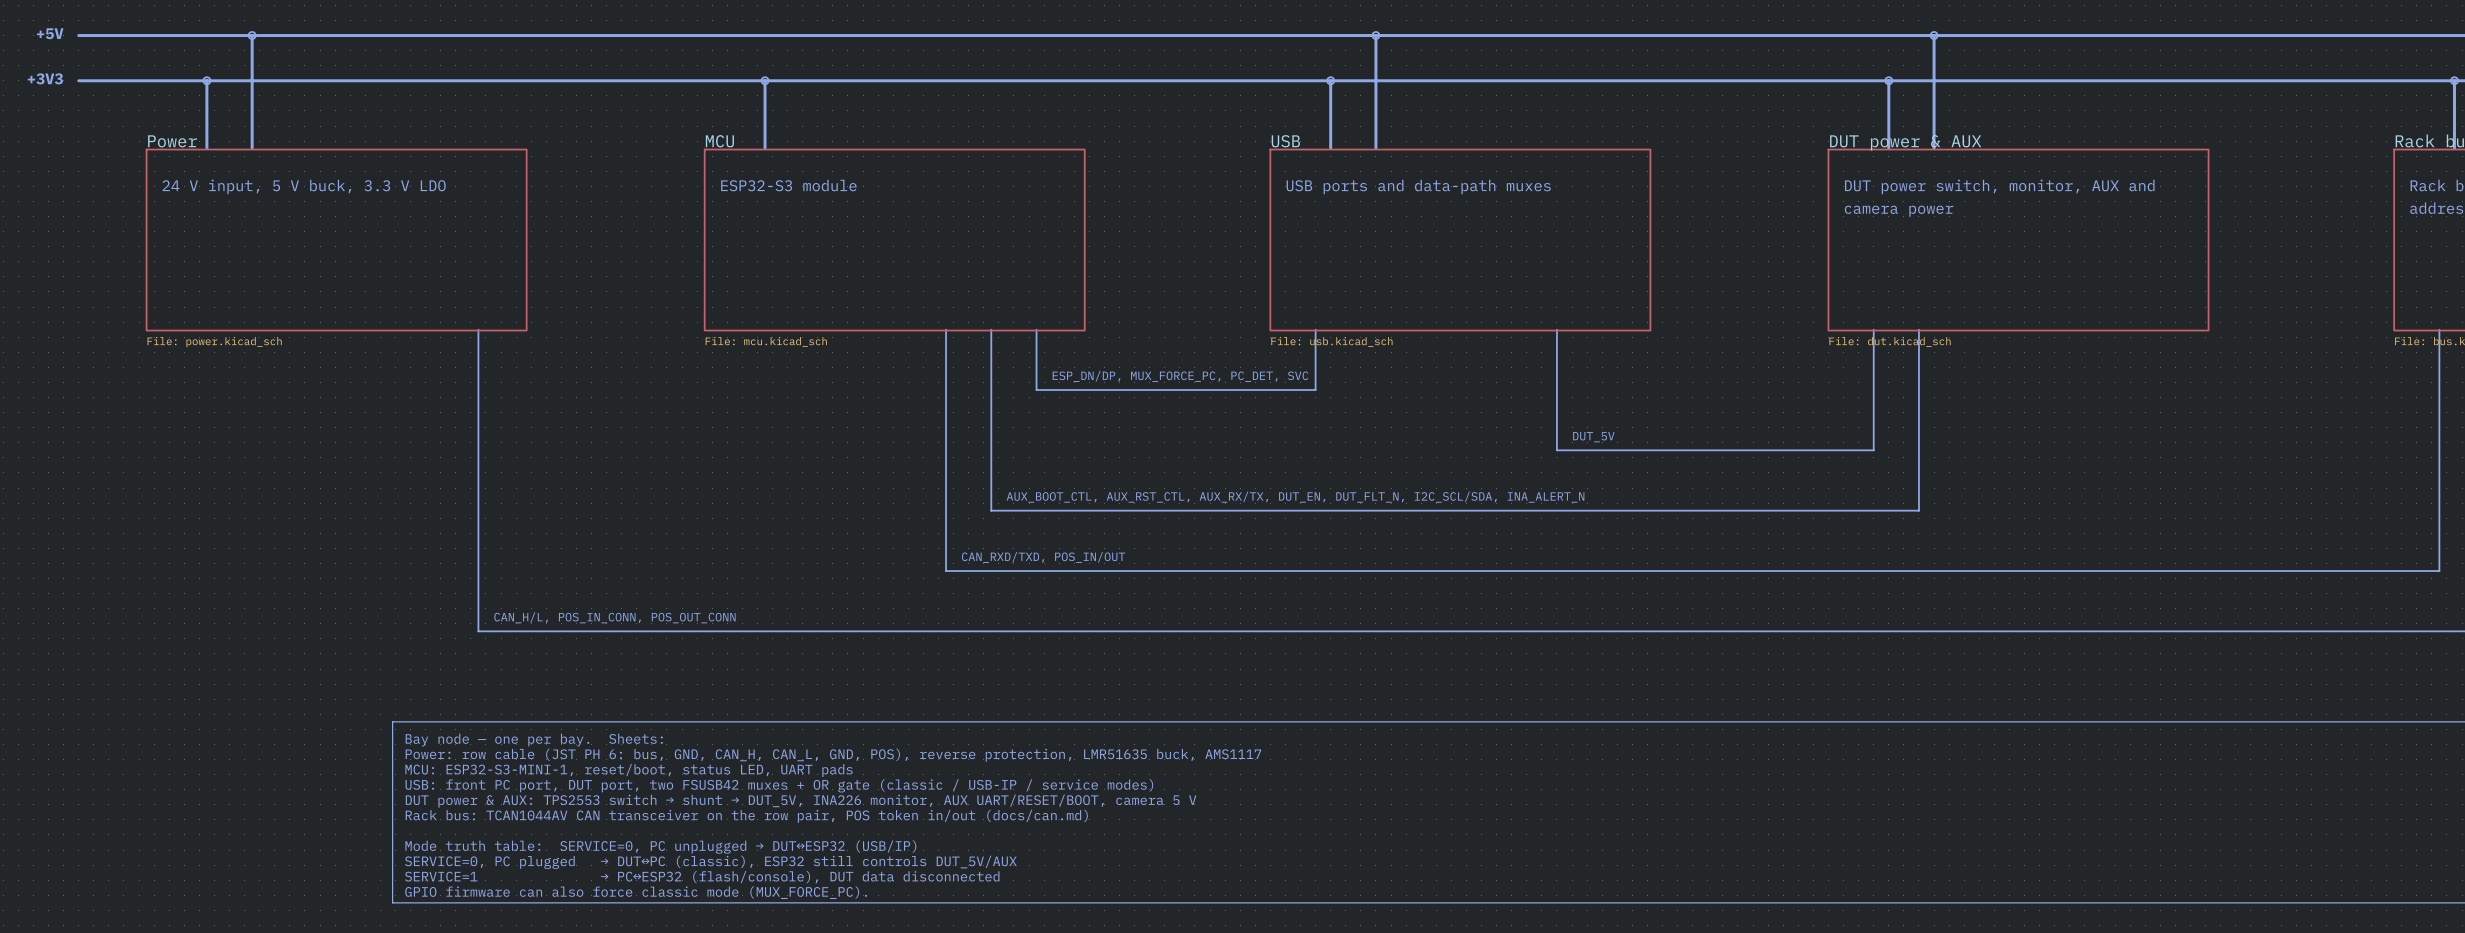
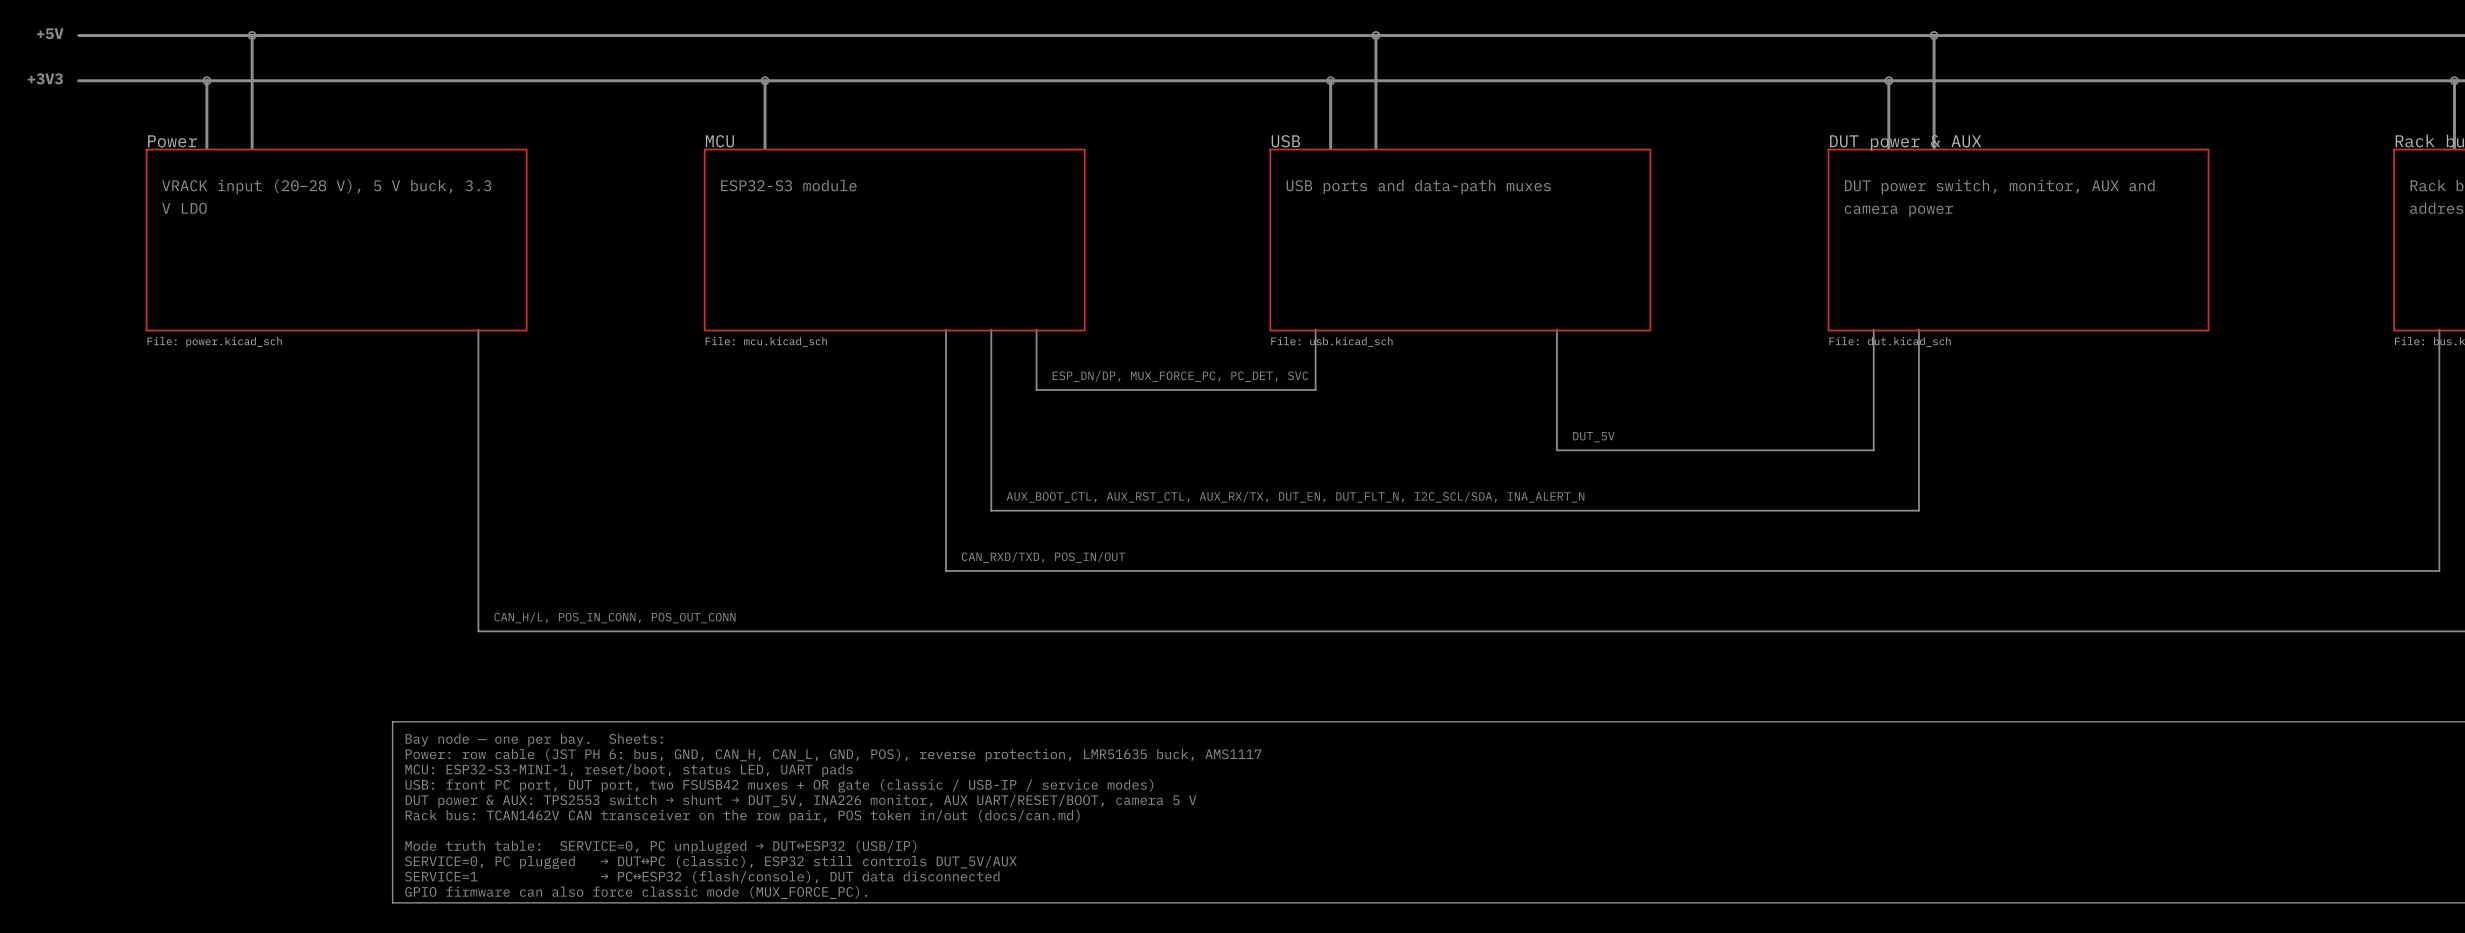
text: 24 V input, 5 V buck, 3.3 V LDO (304, 186) -> VRACK input (20–28 V), 5 V buck, 3.3 (326, 186)
text: none -> V LDO (184, 208)
text: Rack bus: TCAN1044AV CAN transceiver on the row pair, POS token in/out (docs/can.md) (746, 816) -> Rack bus: TCAN1462V CAN transceiver on the row pair, POS token in/out (docs/can.md) (742, 816)

